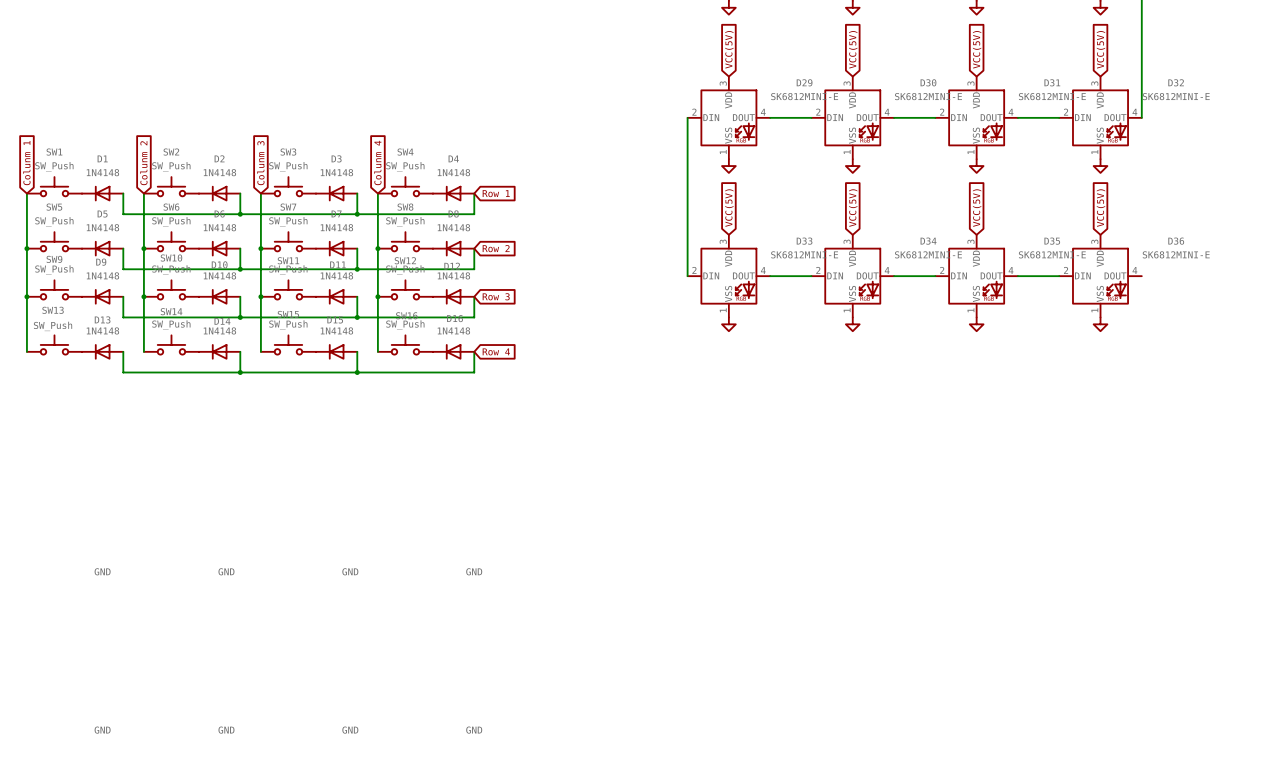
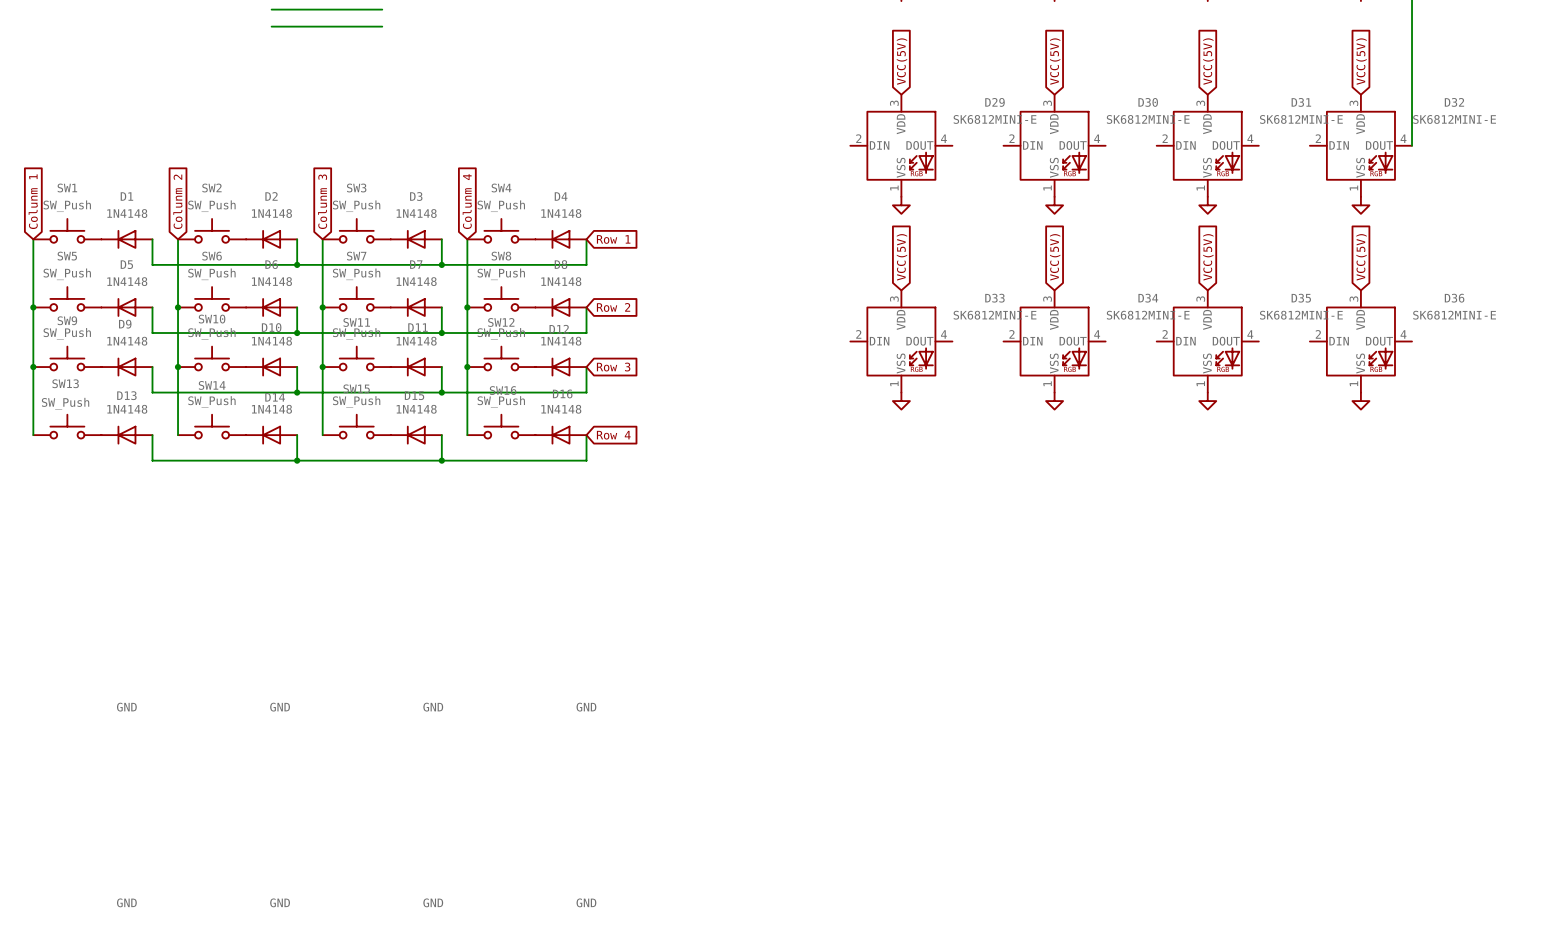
wire: none -> (271, 9) (382, 9)
power symbol: (728, 7) -> none
power symbol: (852, 7) -> none
power symbol: (976, 7) -> none
power symbol: (1100, 7) -> none
wire: none -> (271, 26) (382, 26)
wire: (687, 117) (687, 276) -> none
wire: (770, 117) (811, 117) -> none
wire: (894, 117) (935, 117) -> none
wire: (1017, 117) (1059, 117) -> none
wire: (770, 276) (811, 276) -> none
wire: (894, 276) (935, 276) -> none
wire: (1017, 276) (1059, 276) -> none

